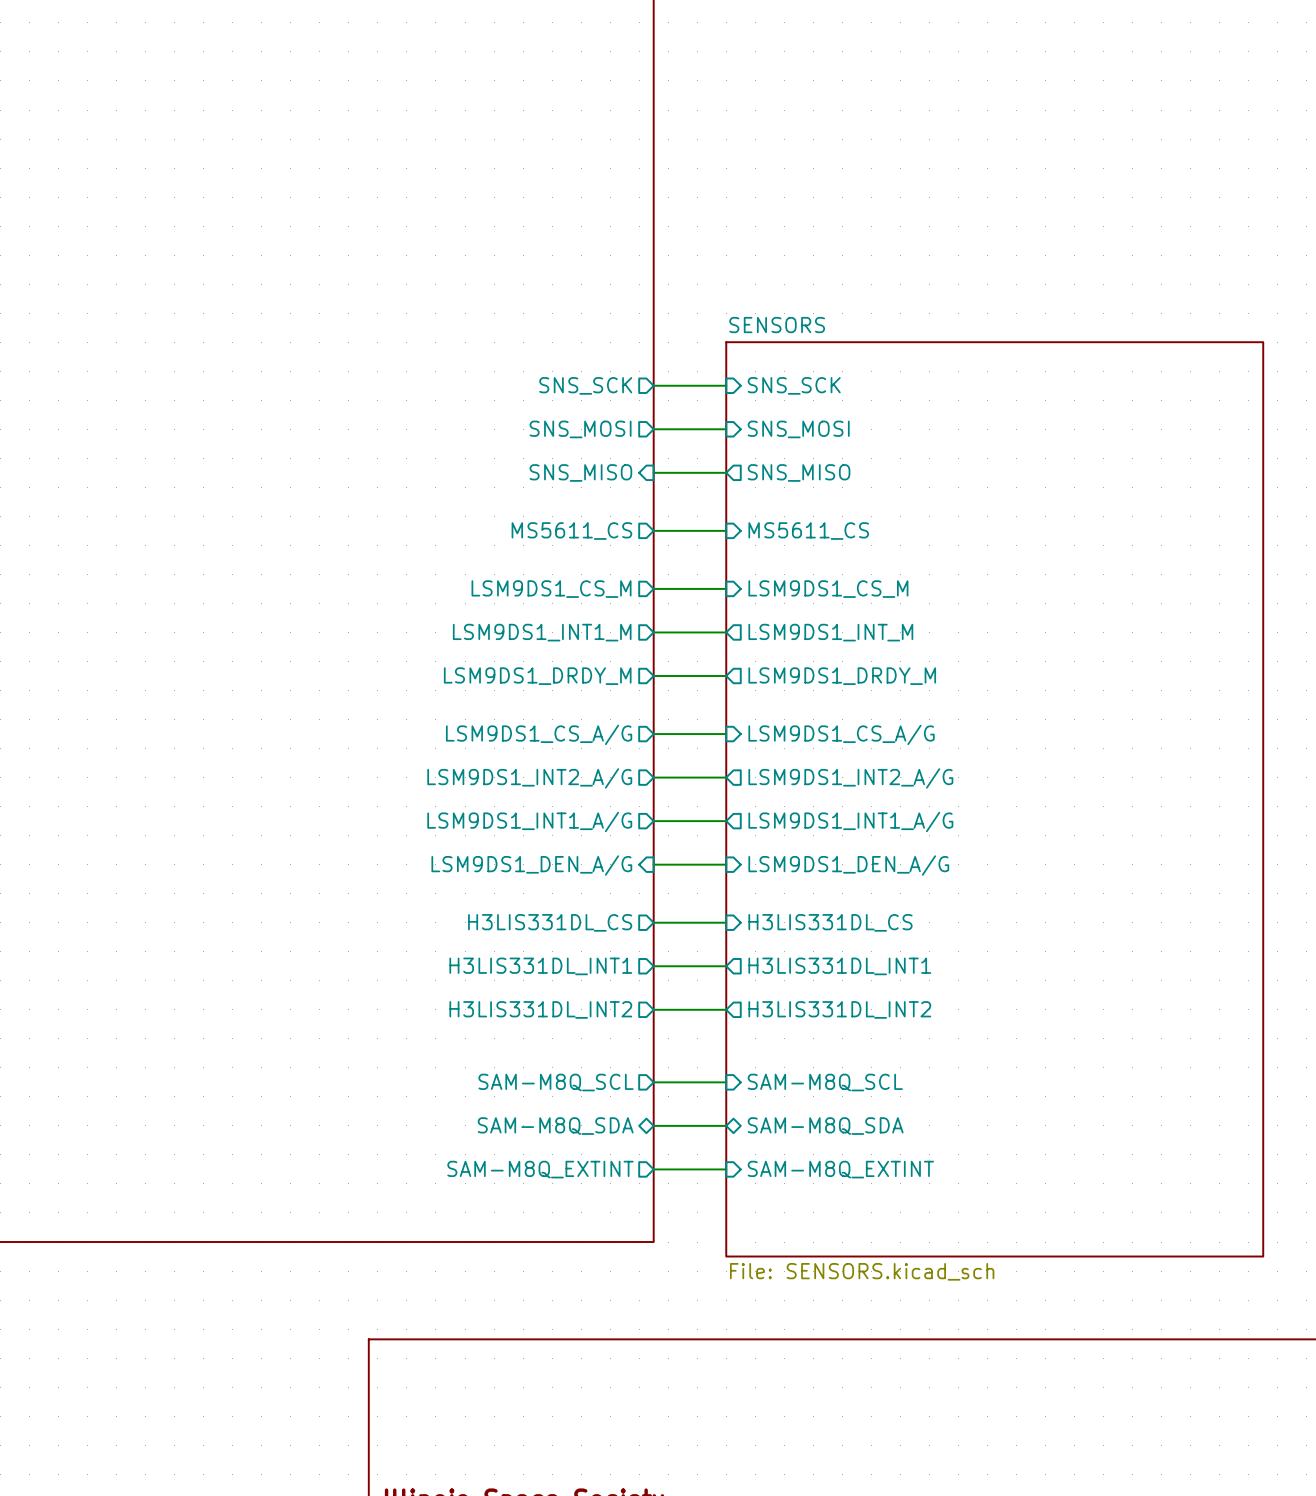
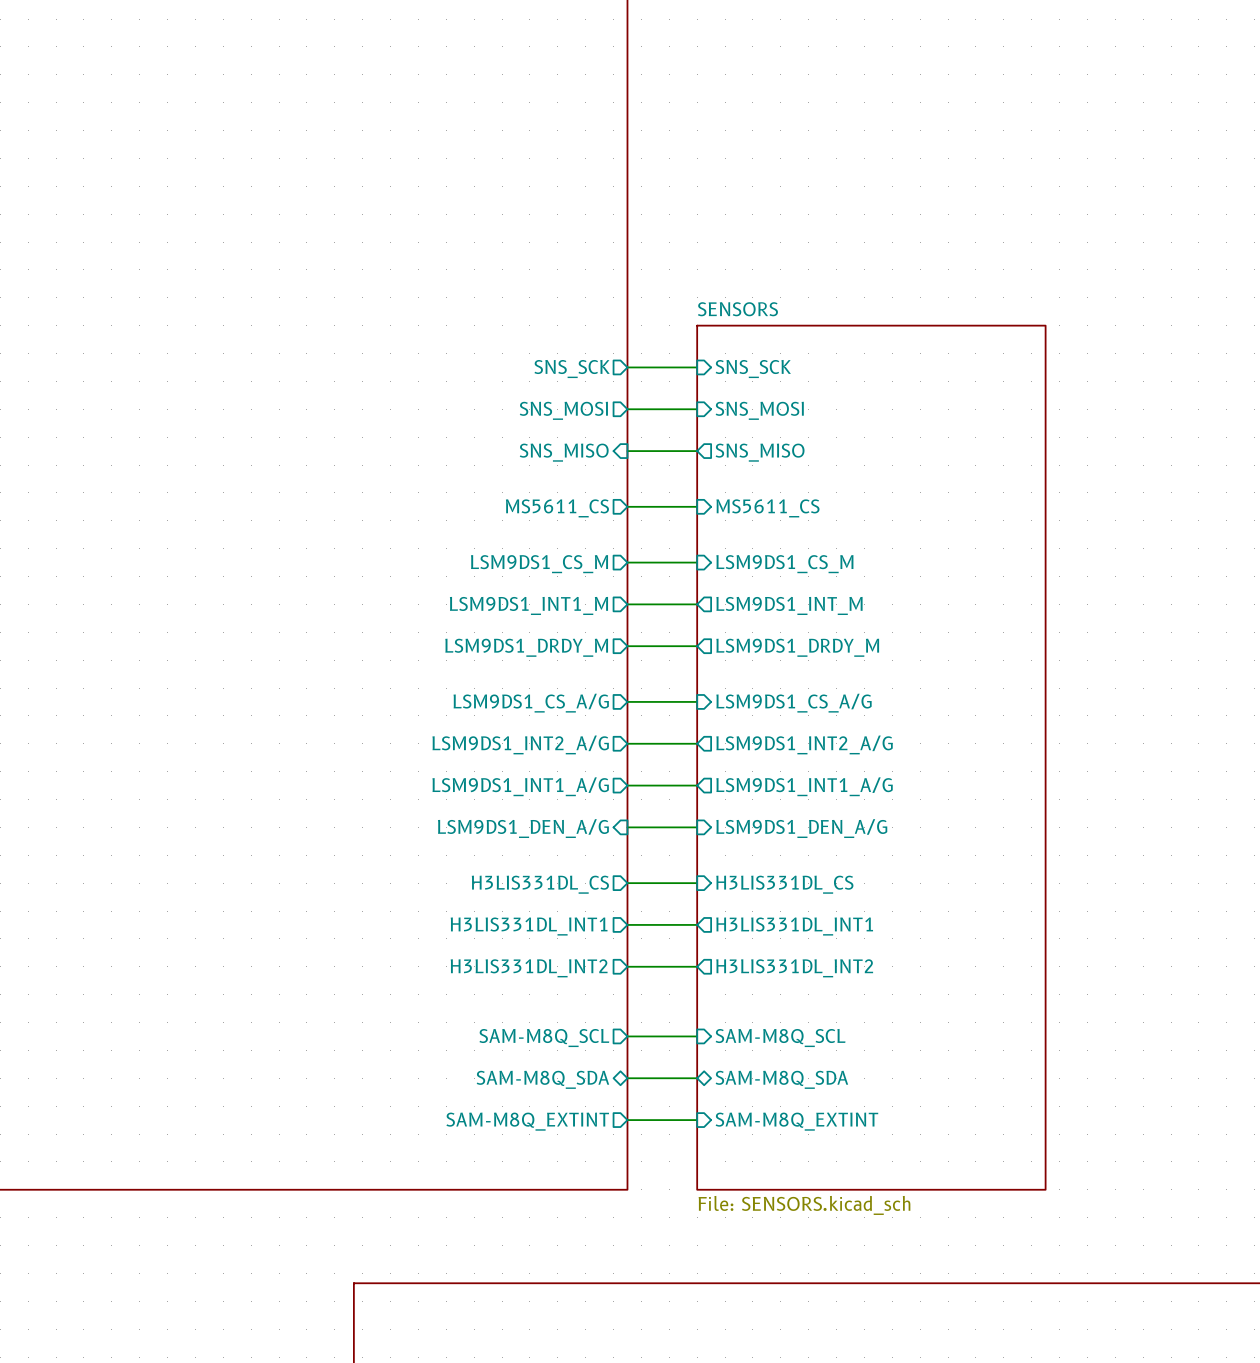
sheet SENSORS: none -> File: SENSORS.kicad_sch (871, 757)
sheet SENSORS: File: SENSORS.kicad_sch (994, 799) -> none

